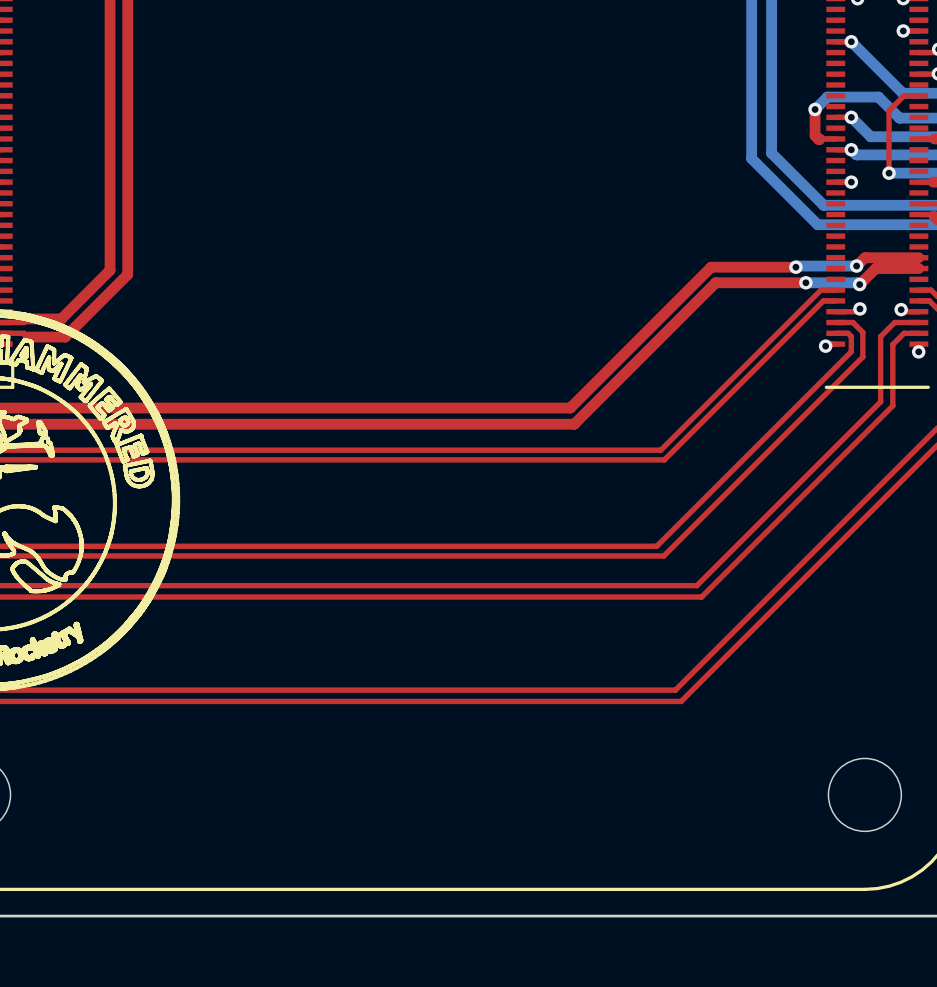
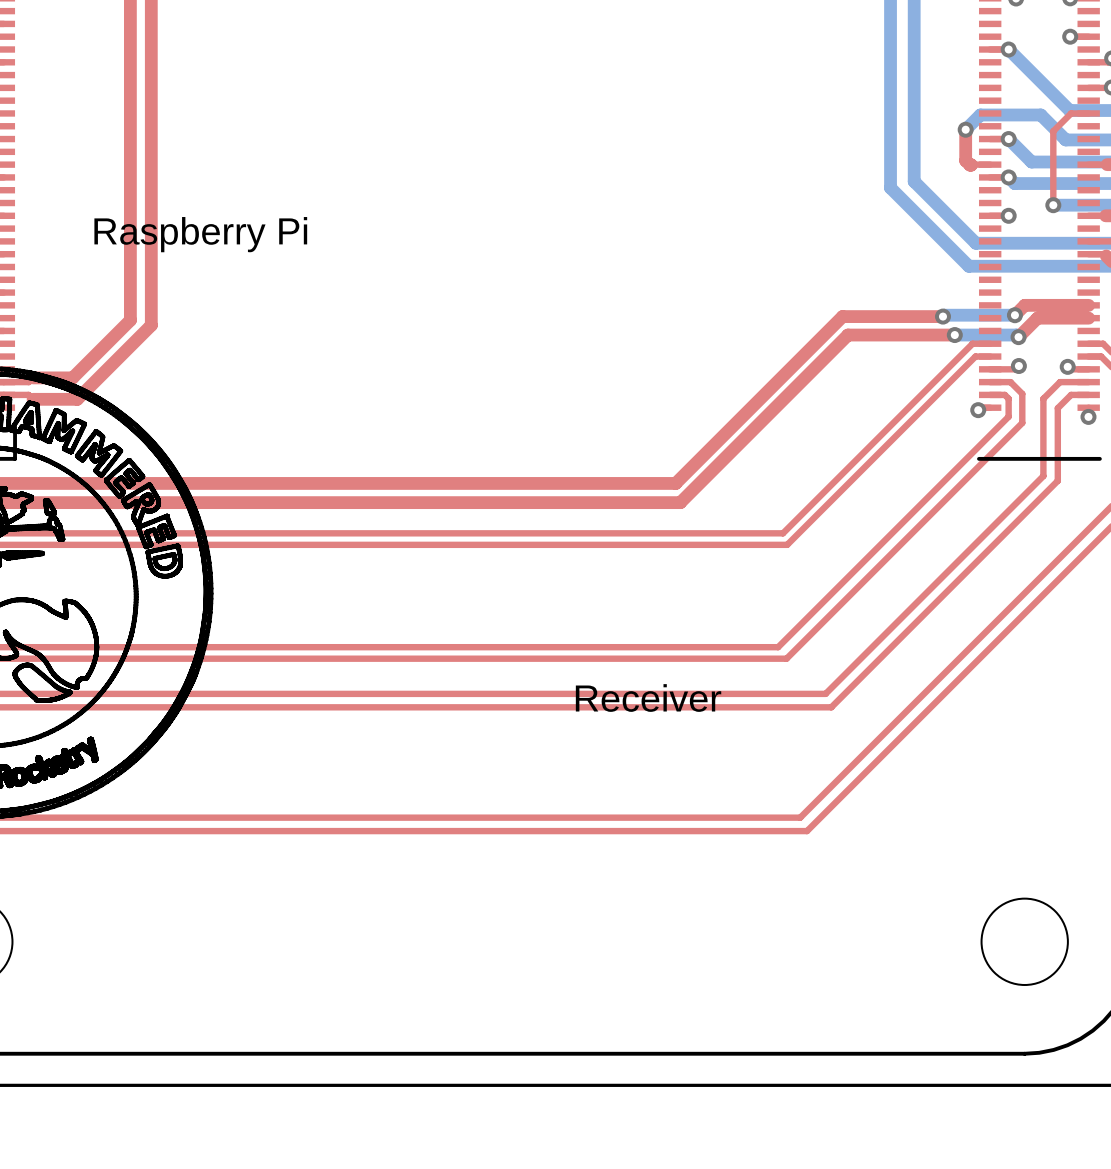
text: none -> Raspberry Pi (200, 234)
text: none -> Receiver (648, 698)

